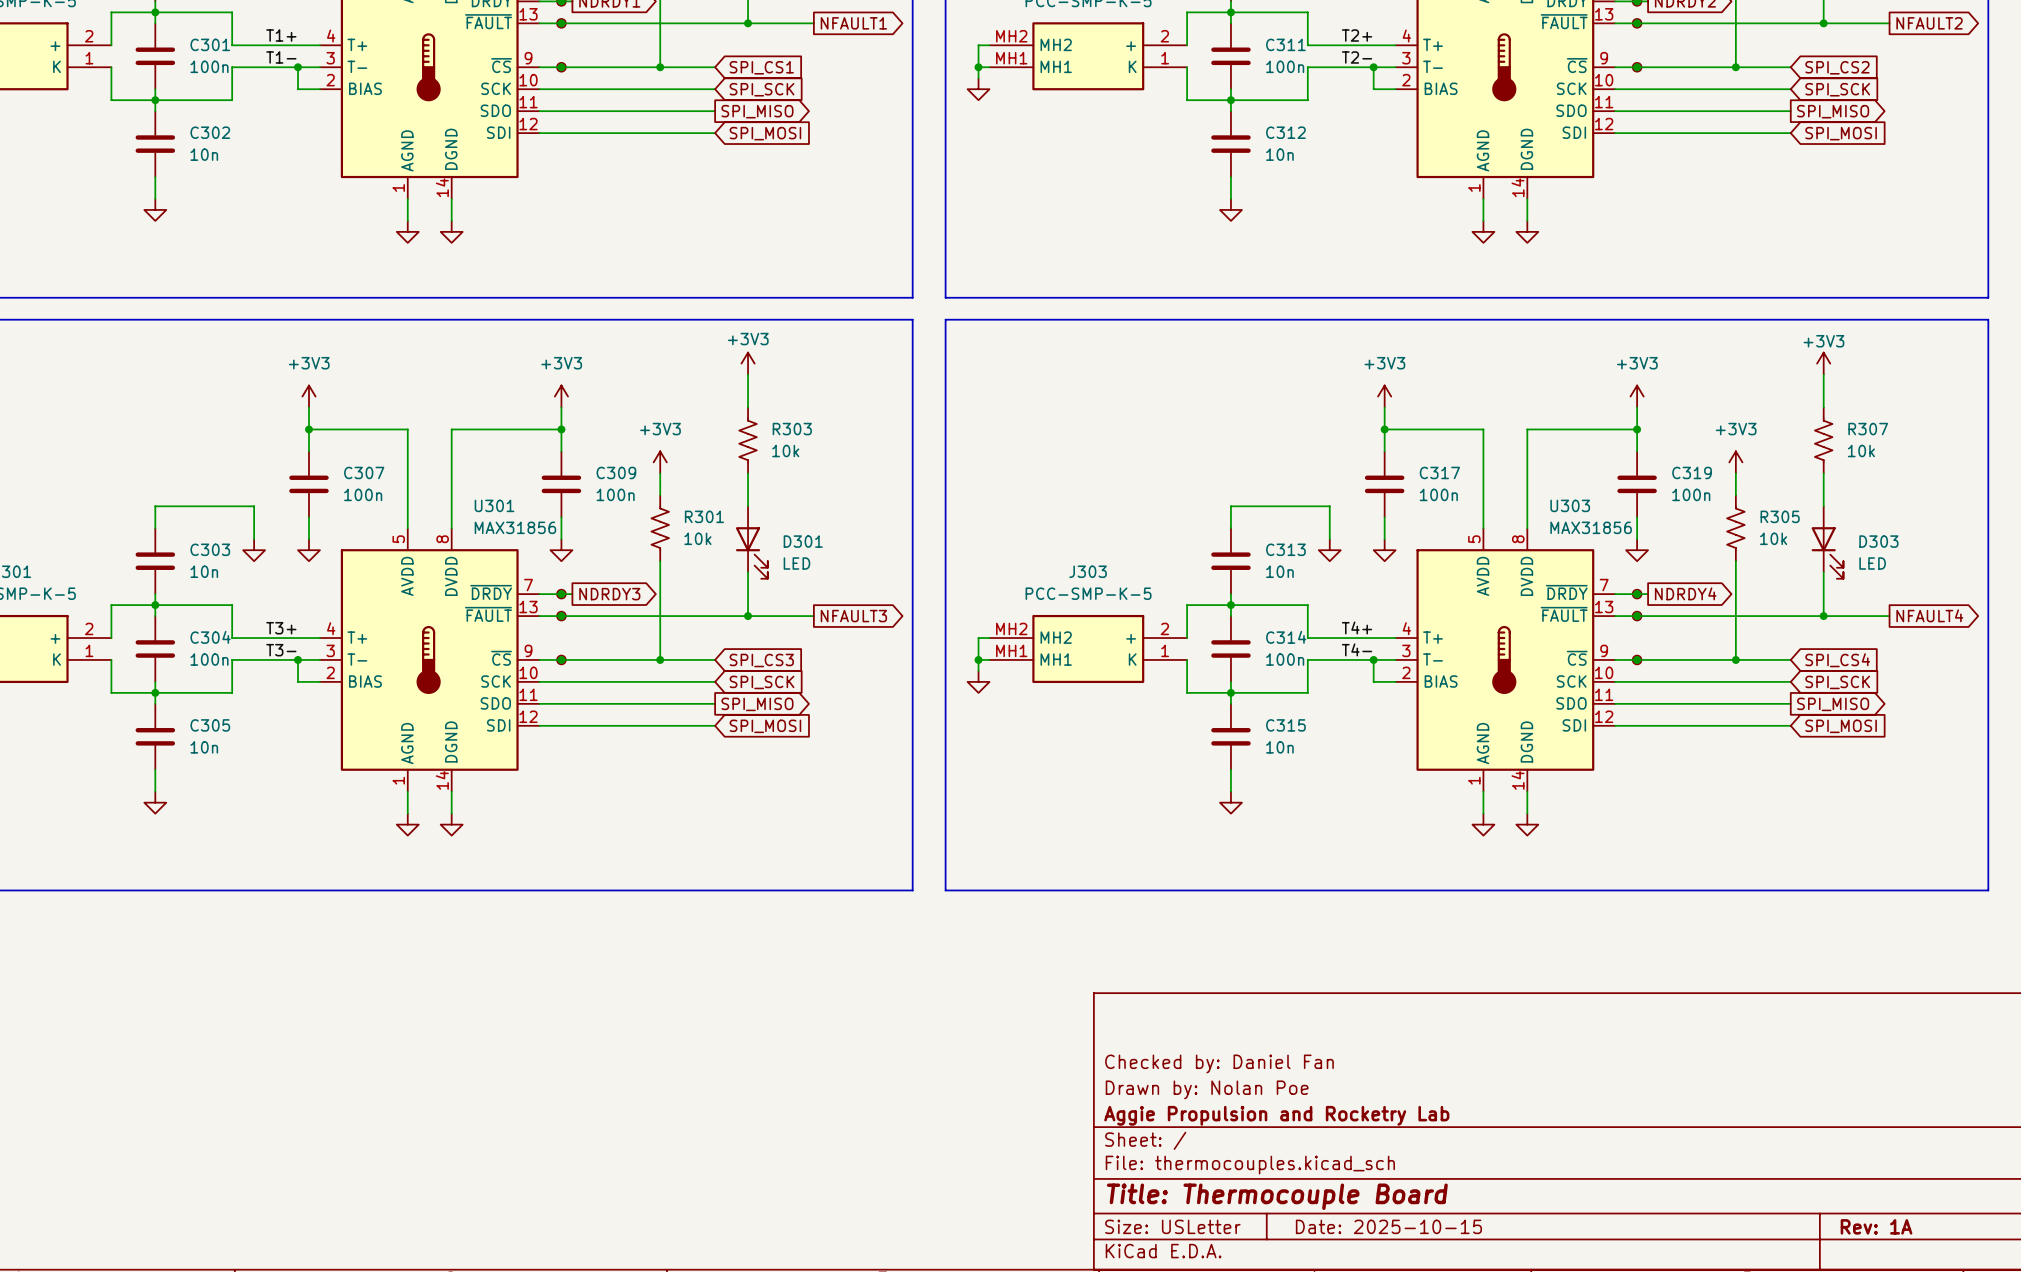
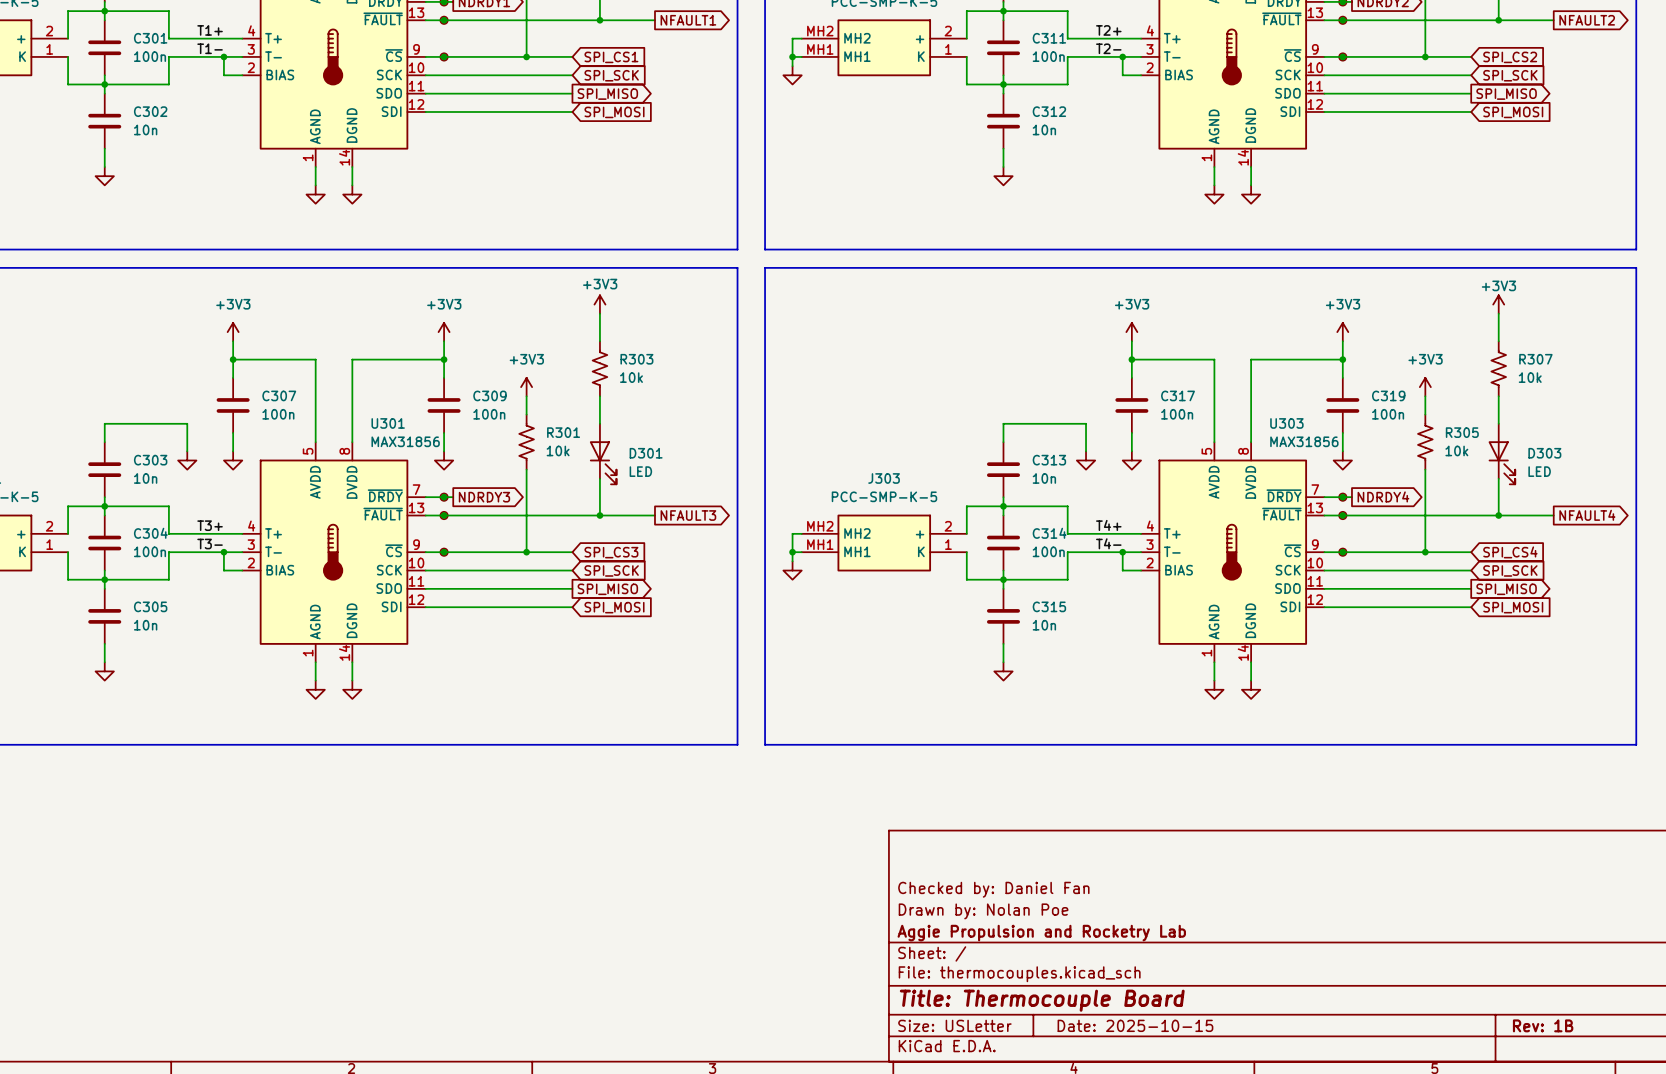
title block: Rev: 1A (1876, 1226) -> Rev: 1B (1543, 1025)

